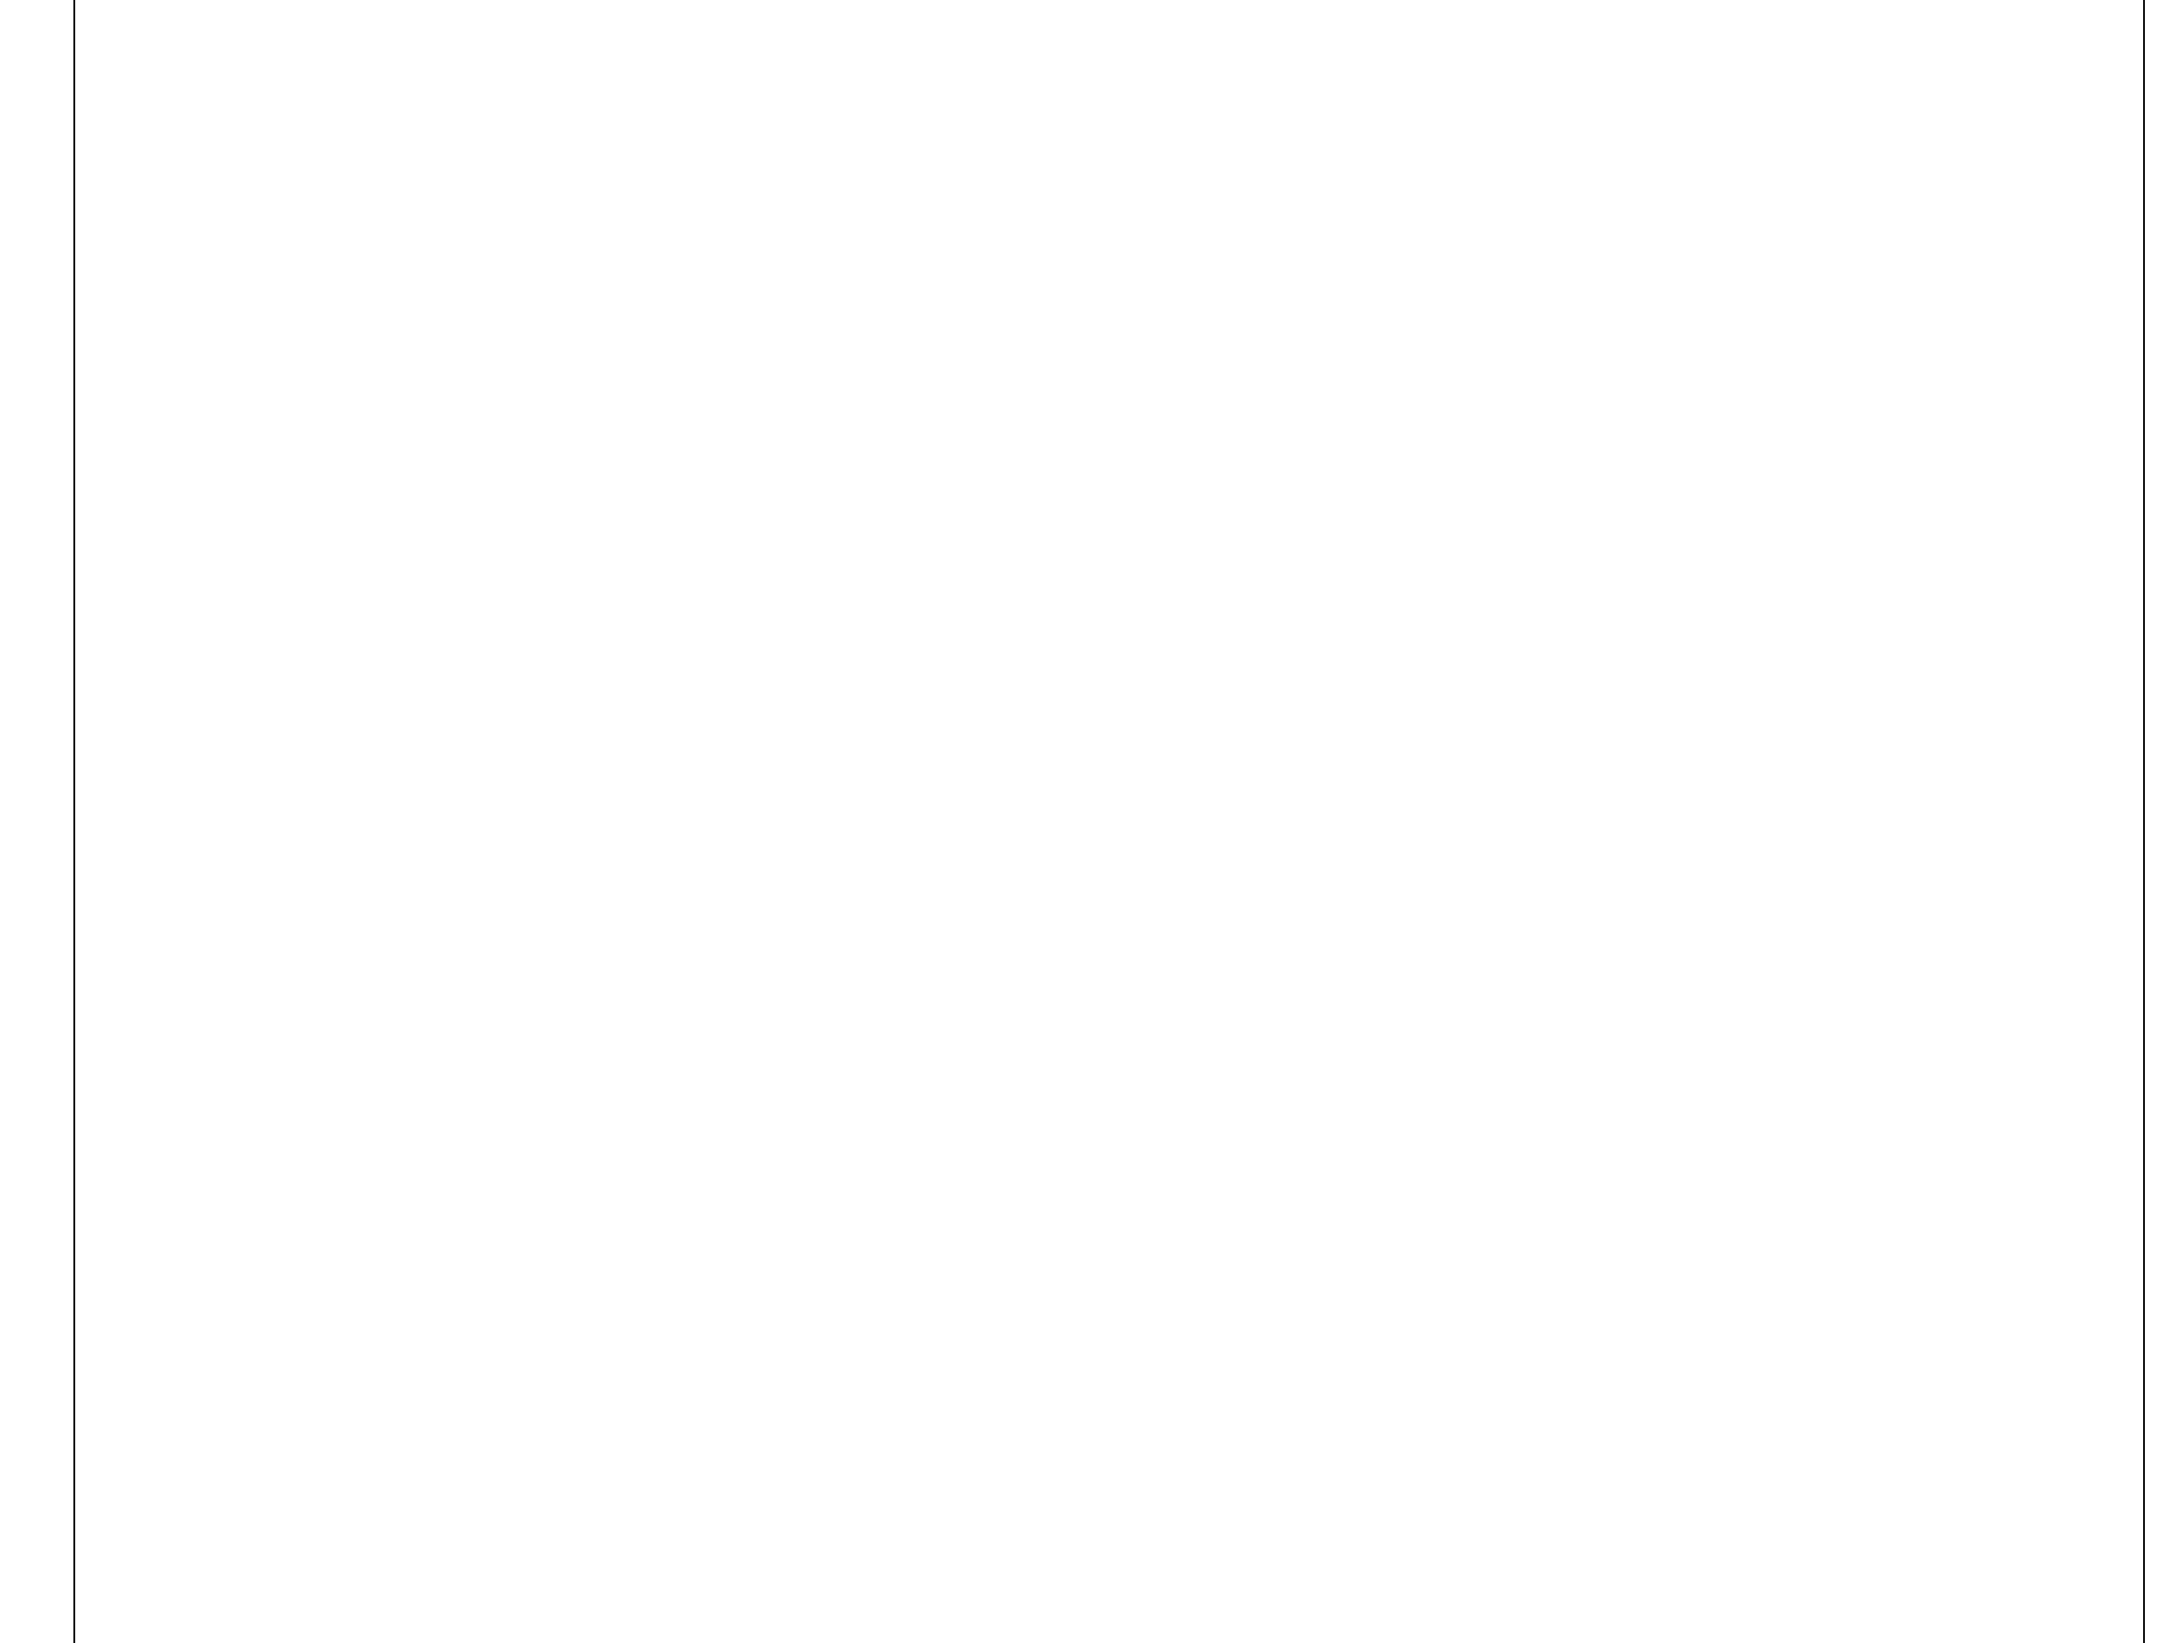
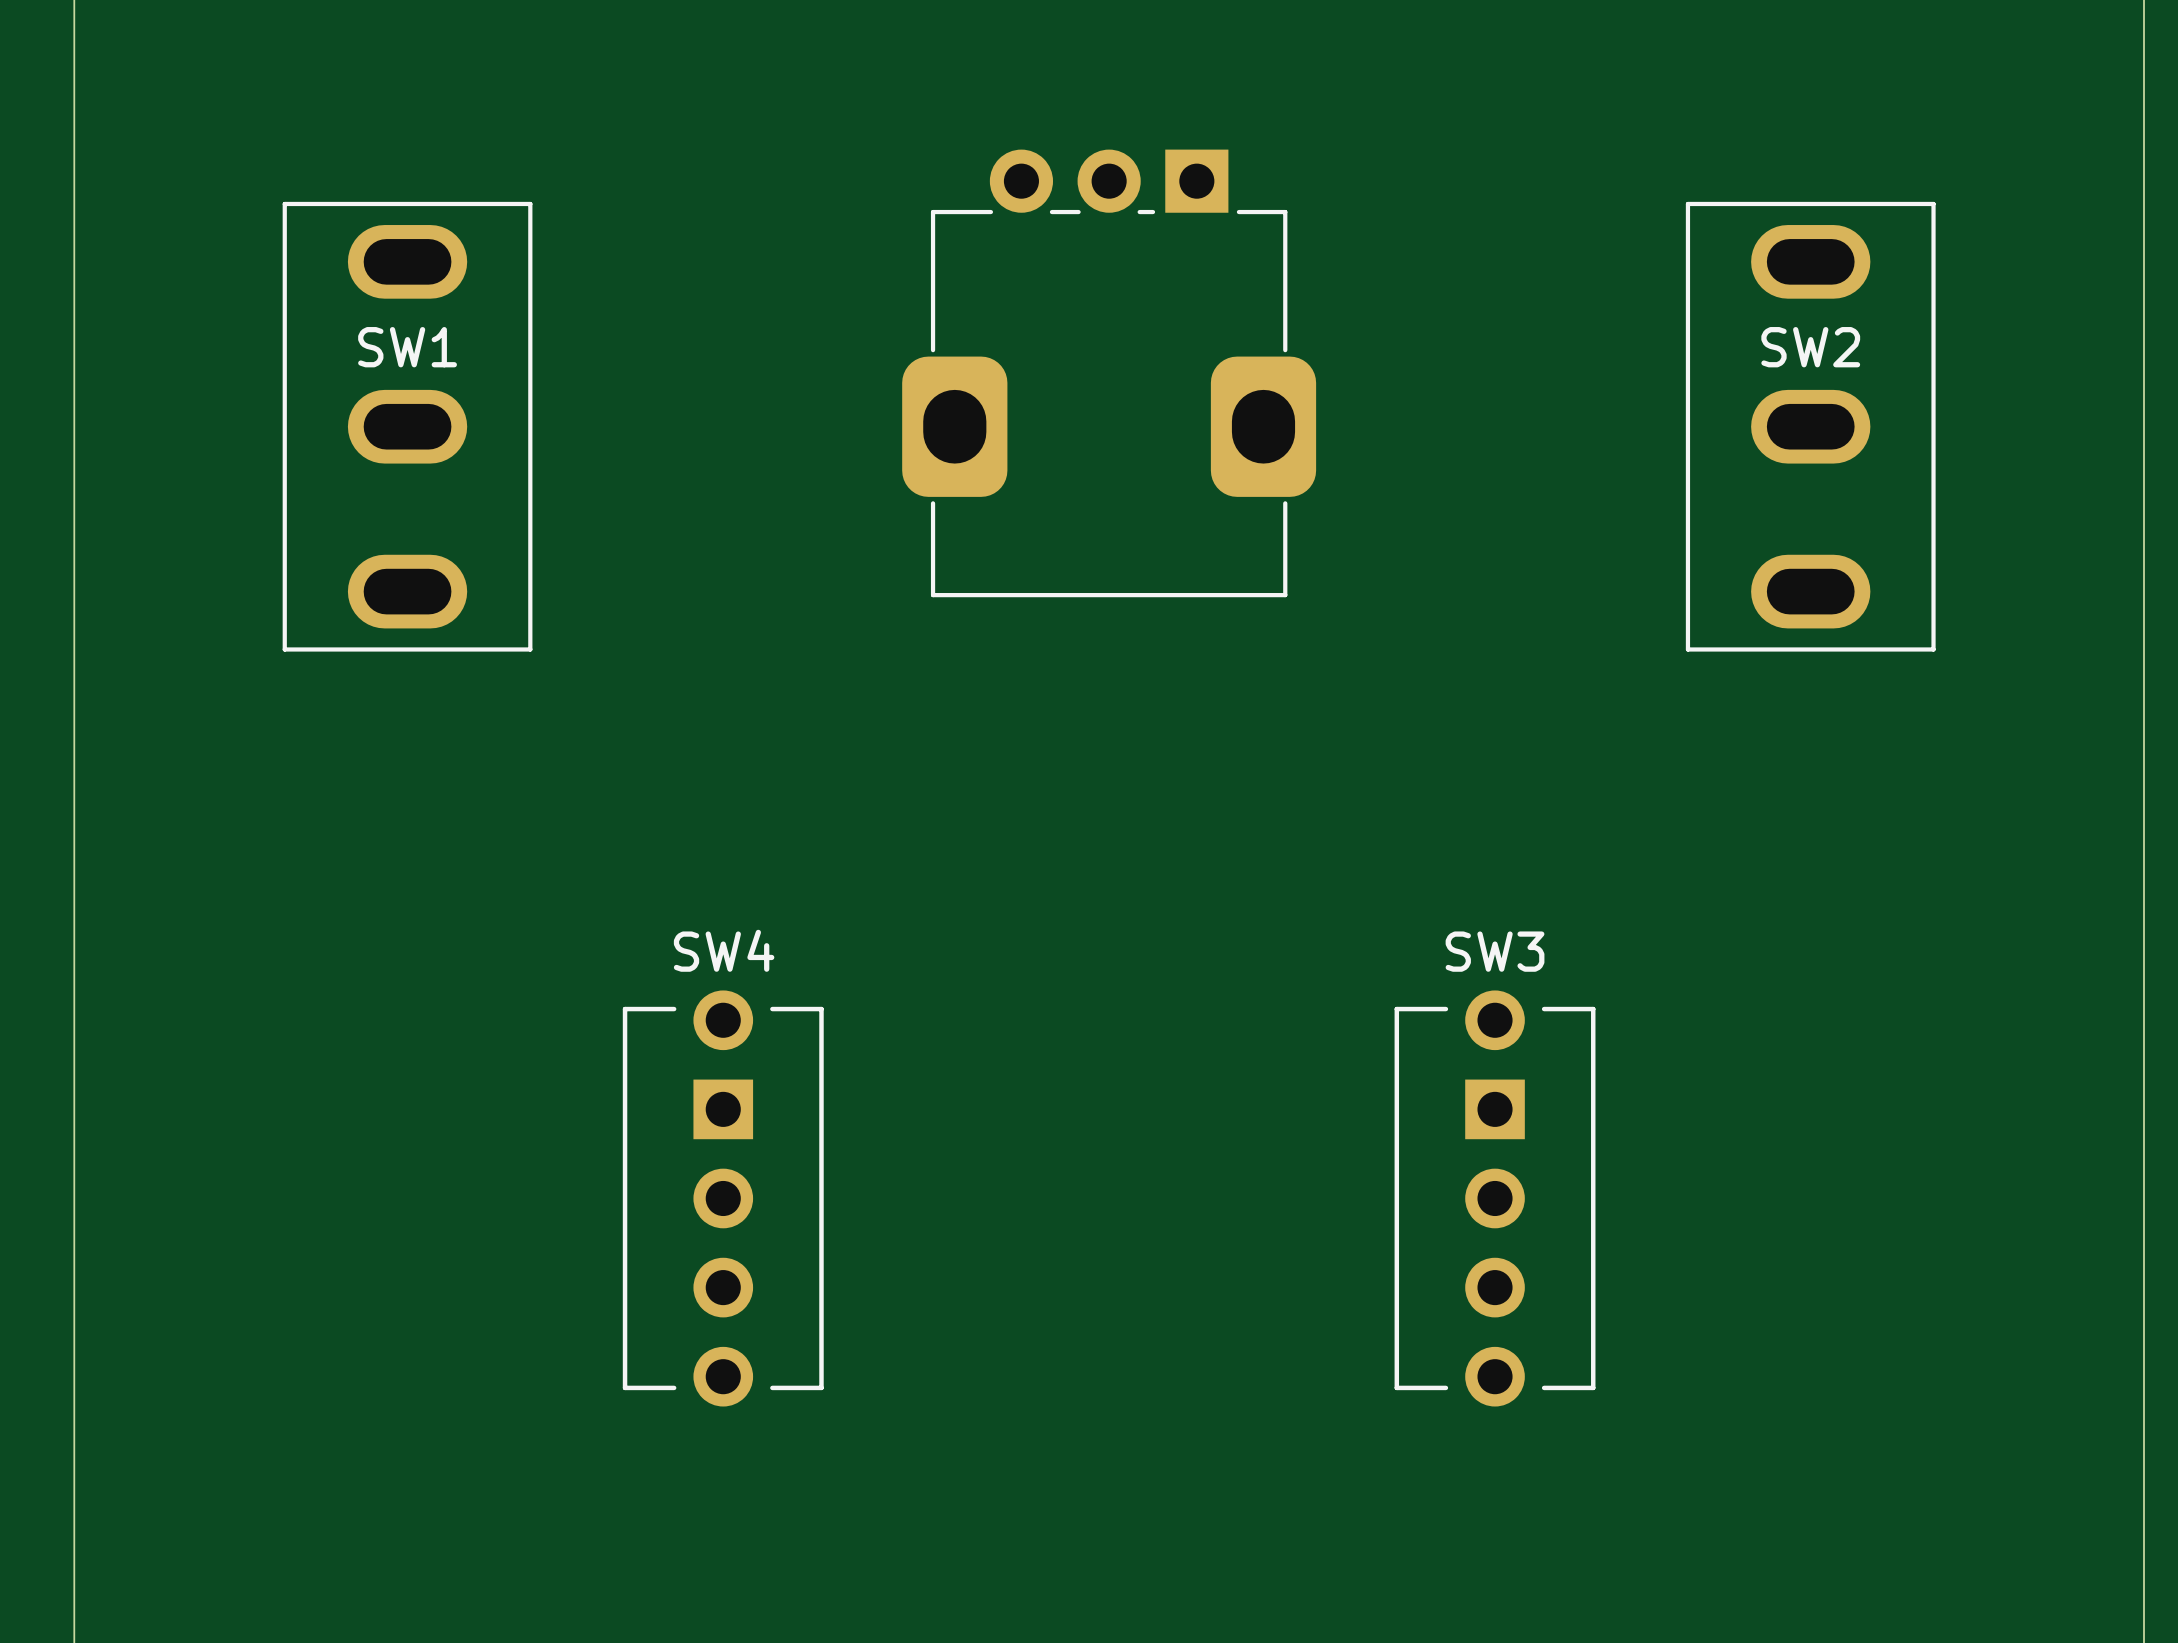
part: none -> (1109, 373)
SW1: none -> (407, 426)
SW2: none -> (1810, 426)
SW4: none -> (723, 1198)
SW3: none -> (1495, 1198)

